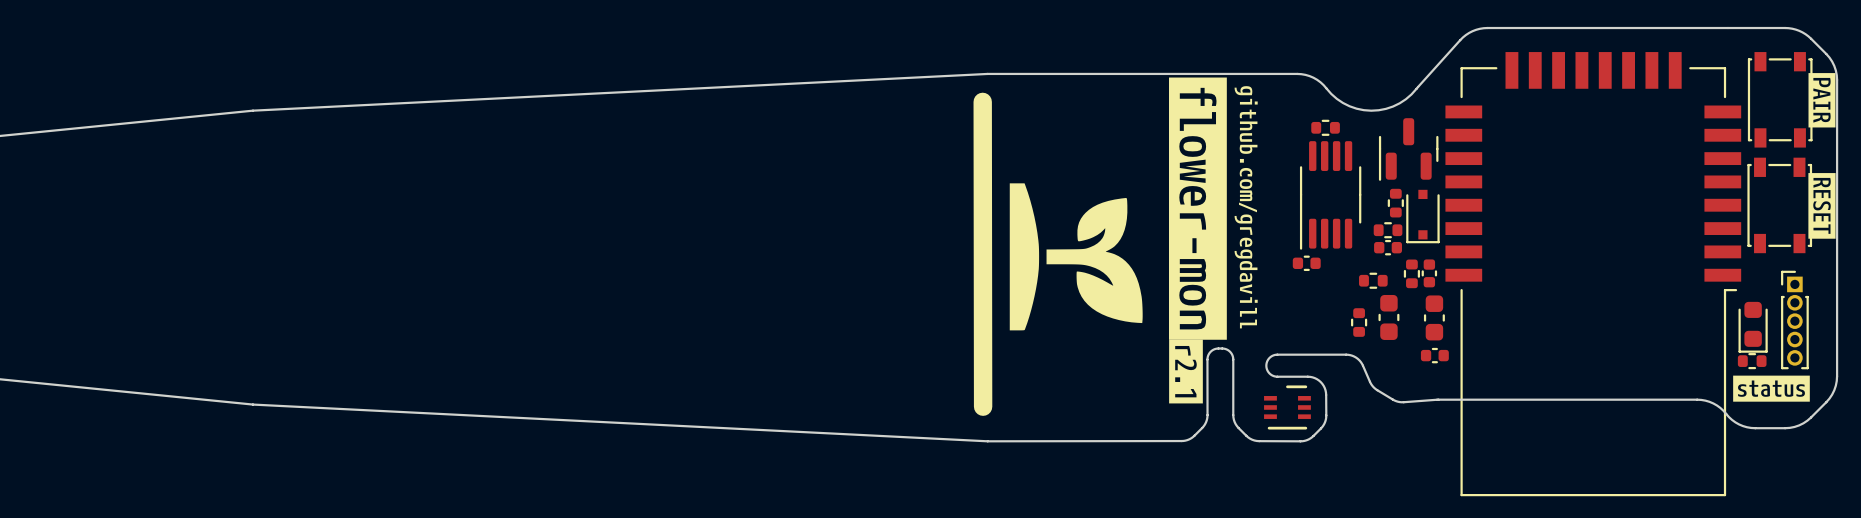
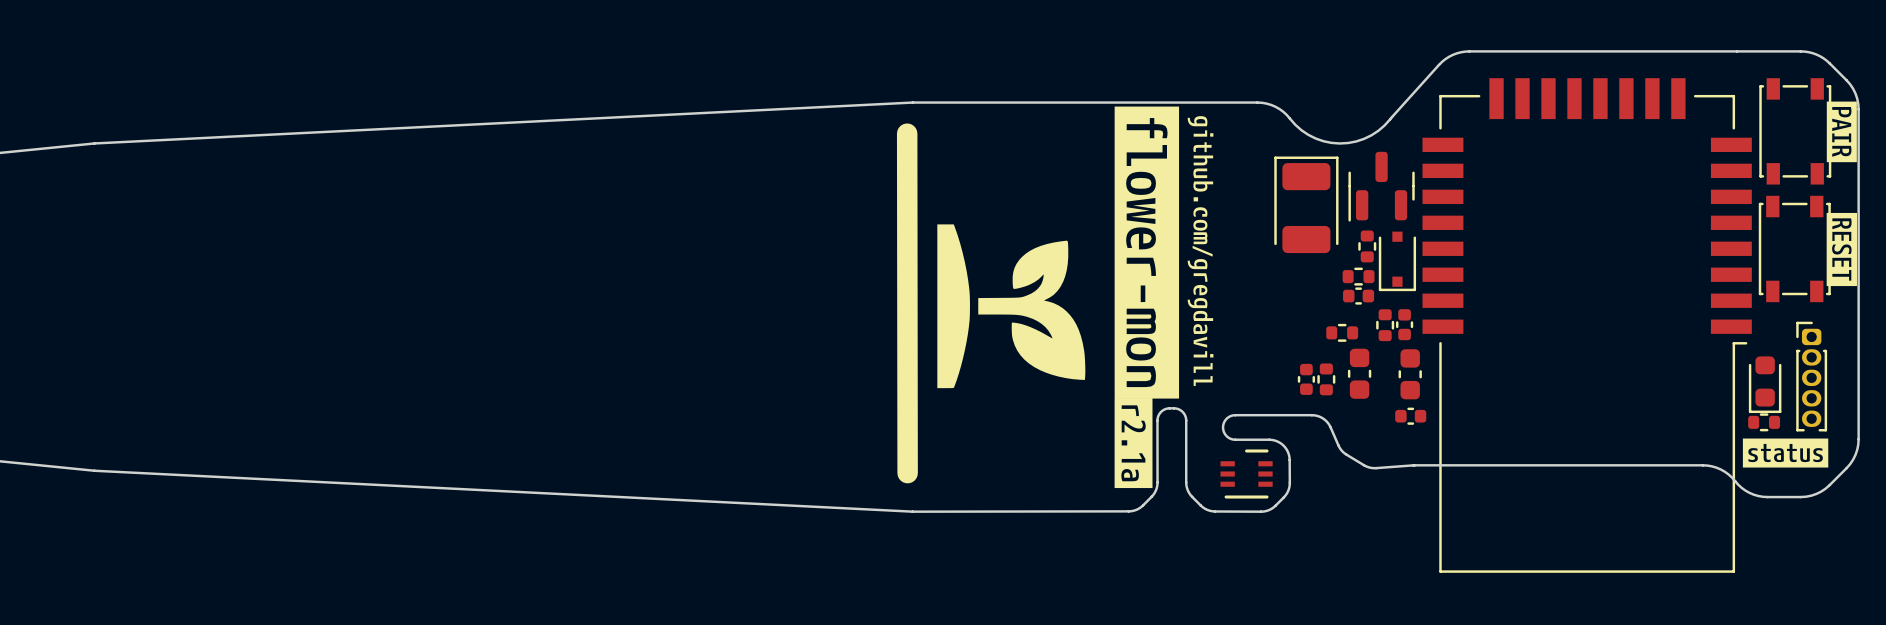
part: (1325, 127) -> none
part: none -> (1306, 204)
part: (1330, 195) -> none
part rotation: 0° (1306, 263) -> 90° clockwise (1306, 379)
part position: (1306, 263) -> (1306, 379)
part footprint: [1781, 270, 1809, 370] -> [1796, 321, 1828, 432]
drawing shape: [1169, 339, 1203, 404] -> [1114, 398, 1153, 489]

